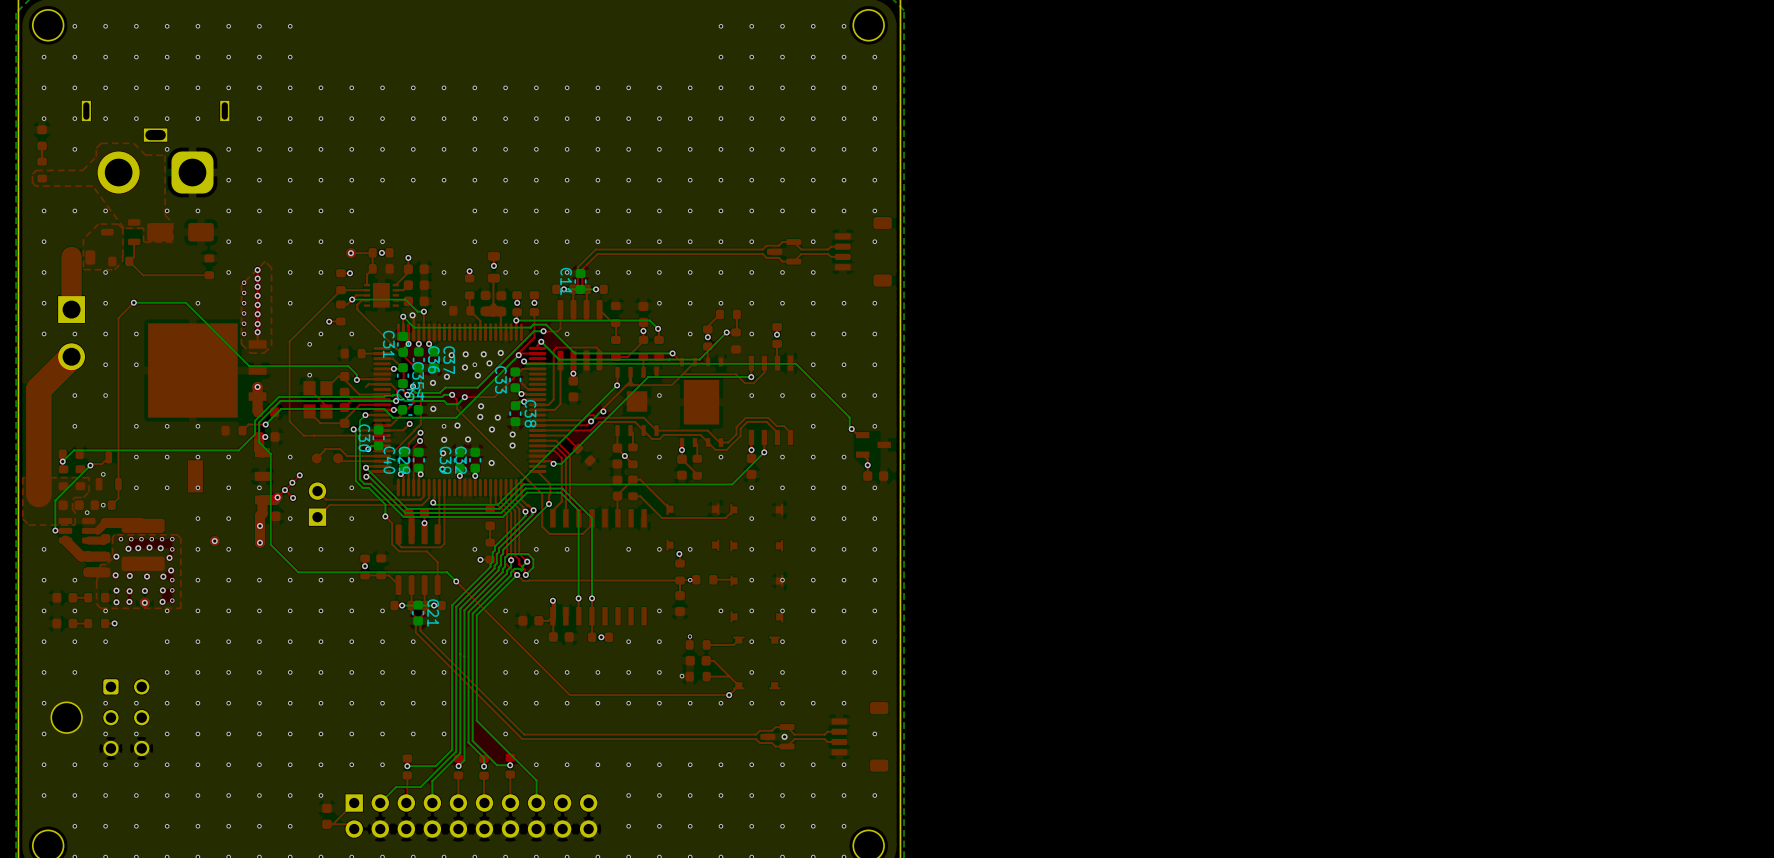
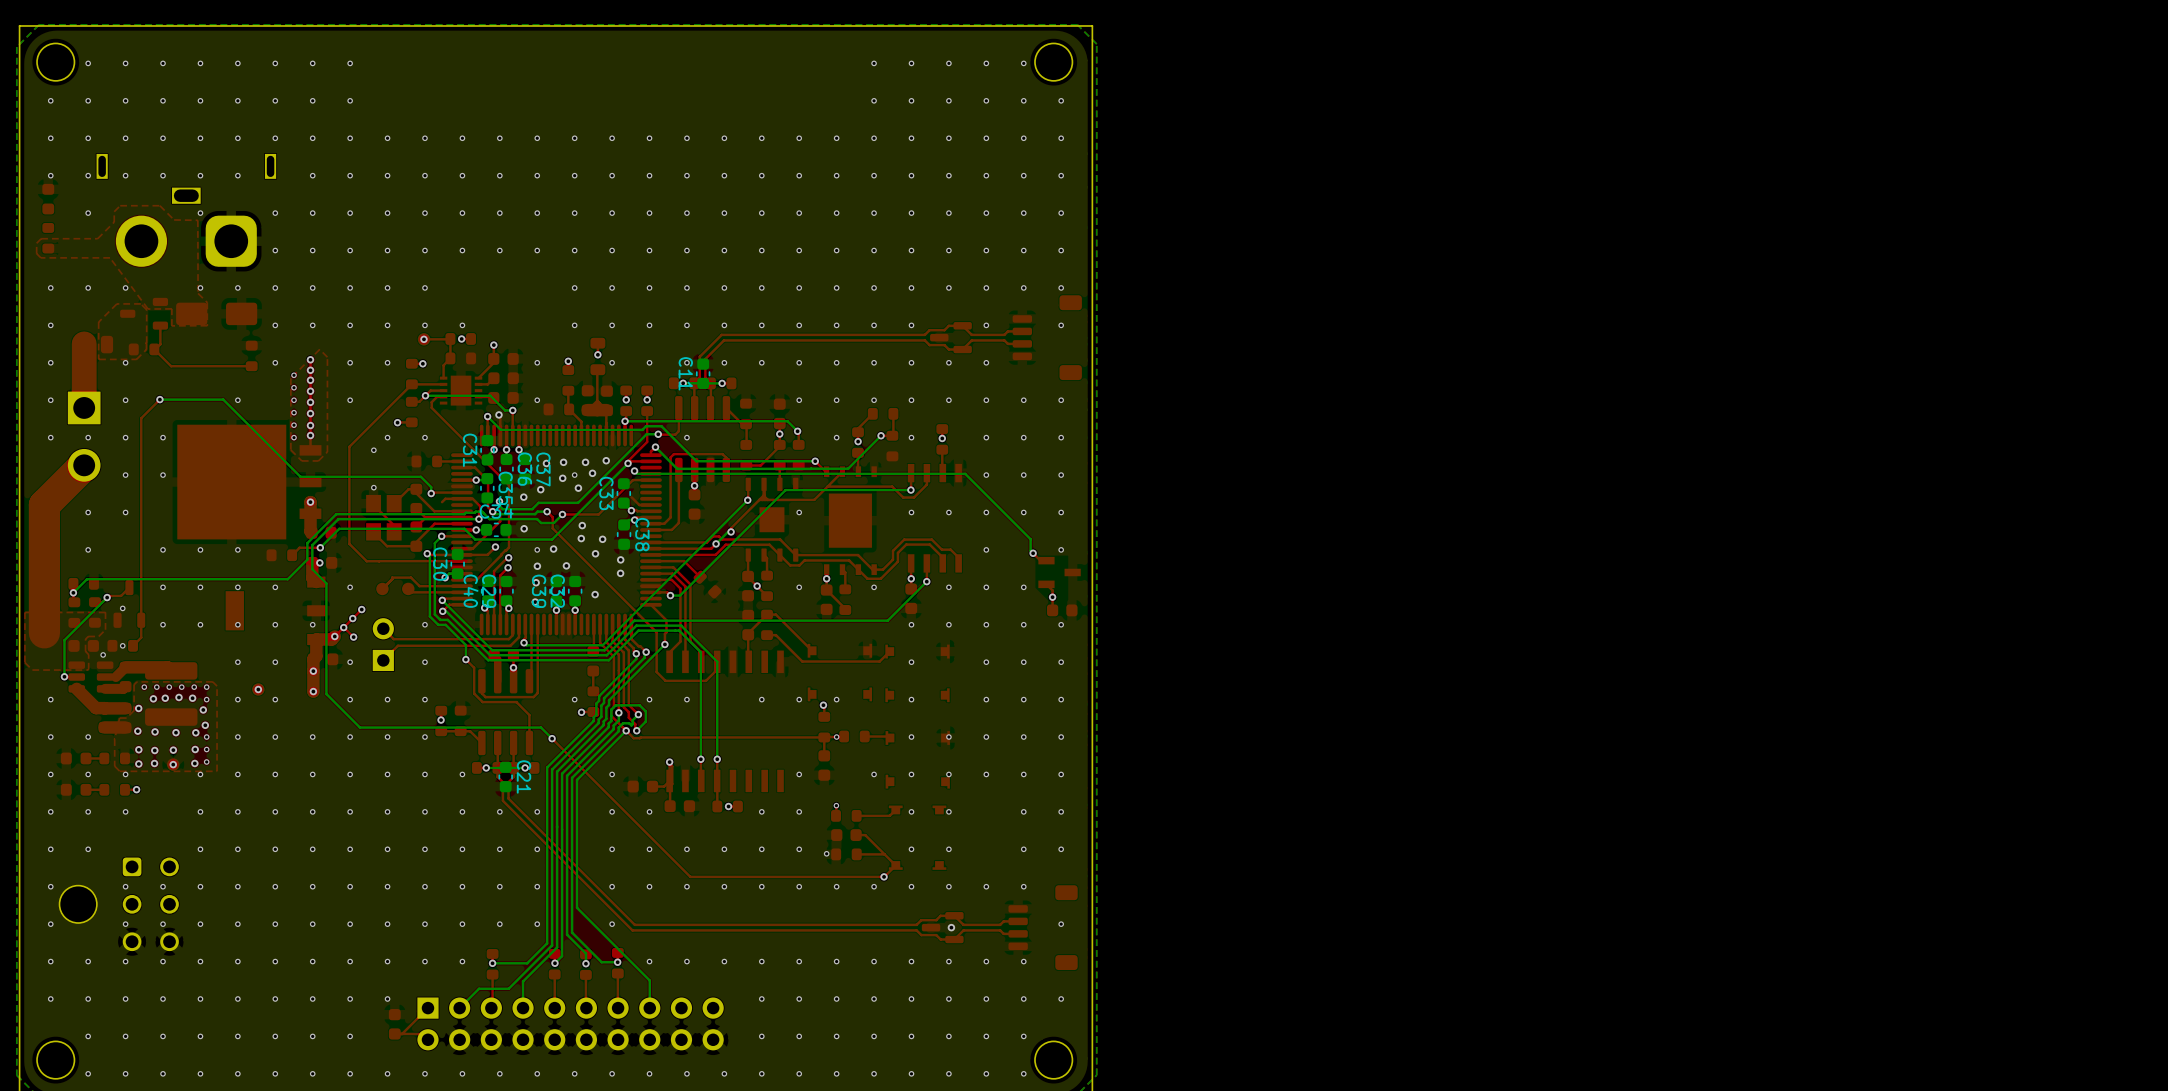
top track: (42, 146) (42, 161) -> none

